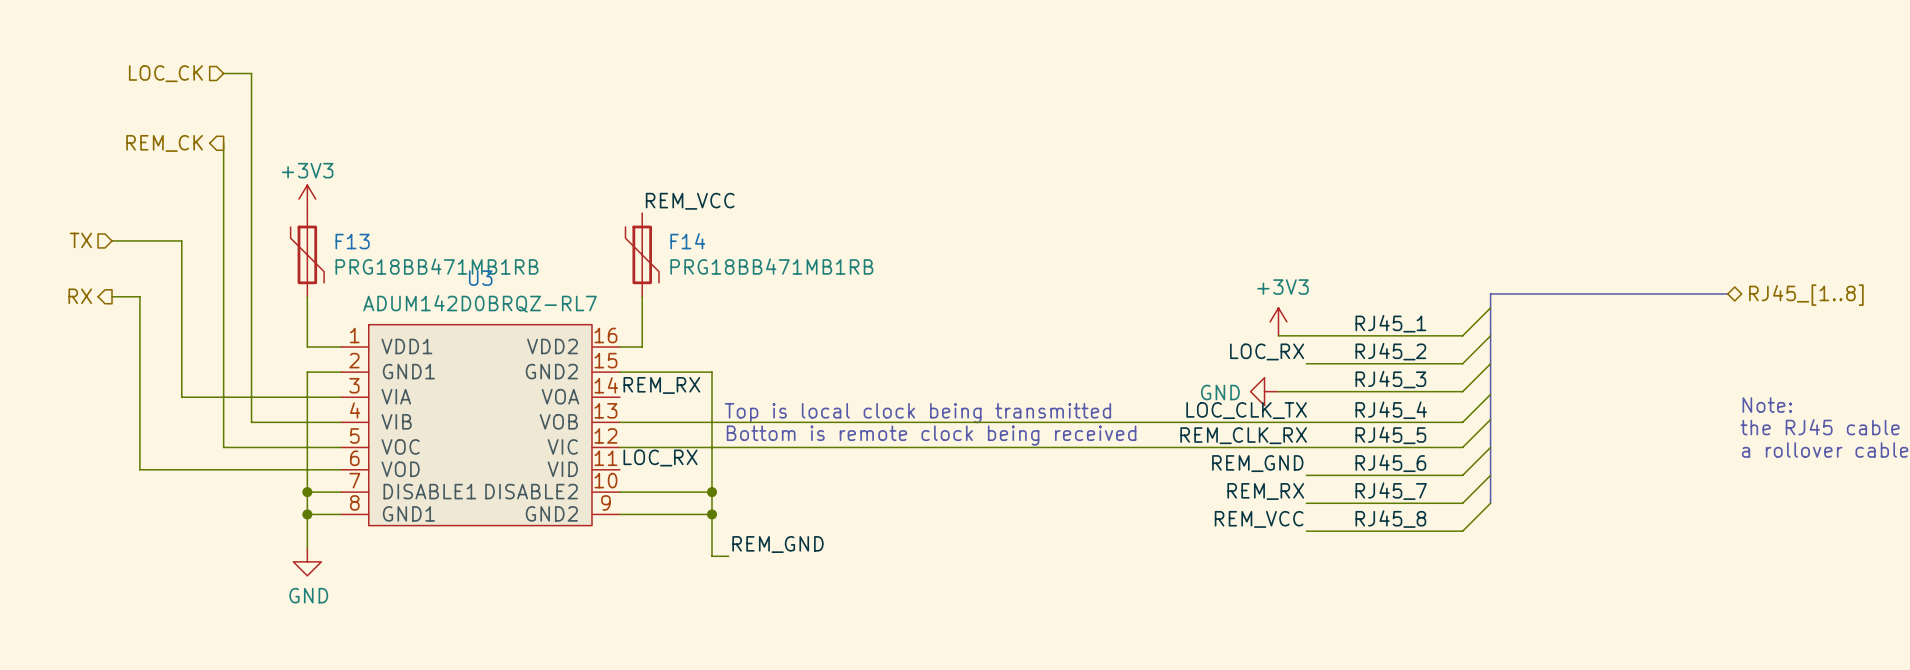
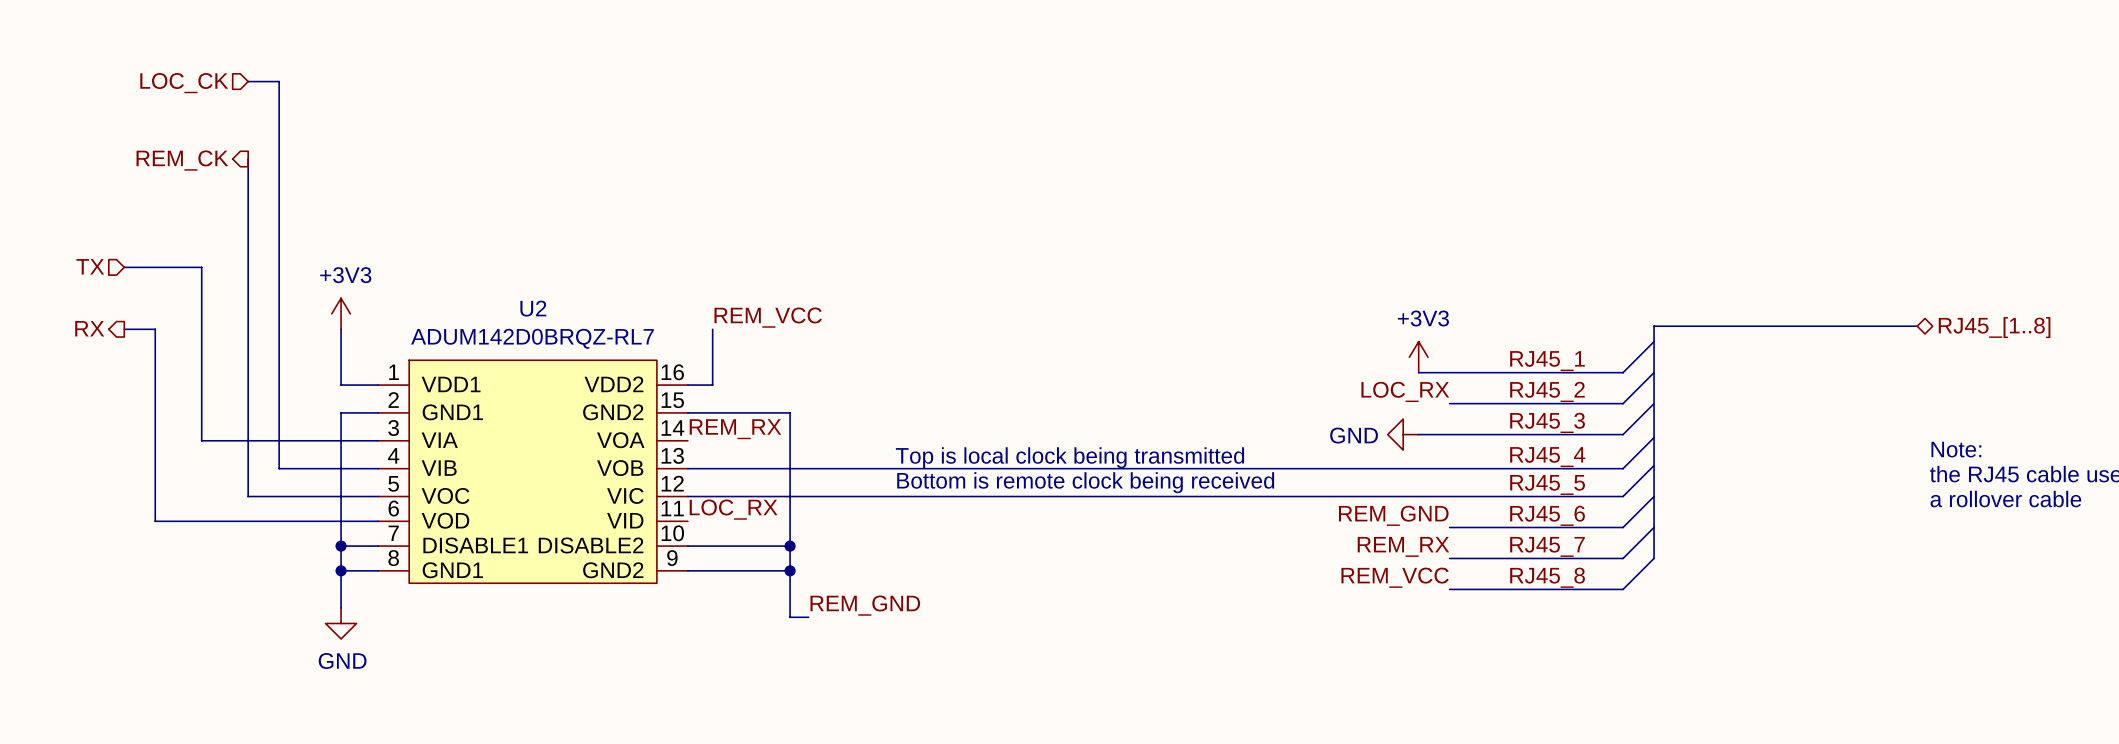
power symbol text position: +3V3 (307, 170) -> +3V3 (345, 275)
power symbol position: +3V3 (307, 199) -> +3V3 (341, 313)
label position: REM_VCC (690, 201) -> REM_VCC (768, 317)
F13: PRG18BB471MB1RB (307, 254) -> none
F14: PRG18BB471MB1RB (642, 254) -> none
U3 name: U3 (480, 278) -> U2 (533, 308)
label: LOC_CLK_TX (1246, 410) -> none
text position: Top is local clock being transmitted (917, 413) -> Top is local clock being transmitted (1070, 457)
text position: Bottom is remote clock being received (931, 435) -> Bottom is remote clock being received (1085, 482)
label: REM_CLK_RX (1243, 435) -> none

